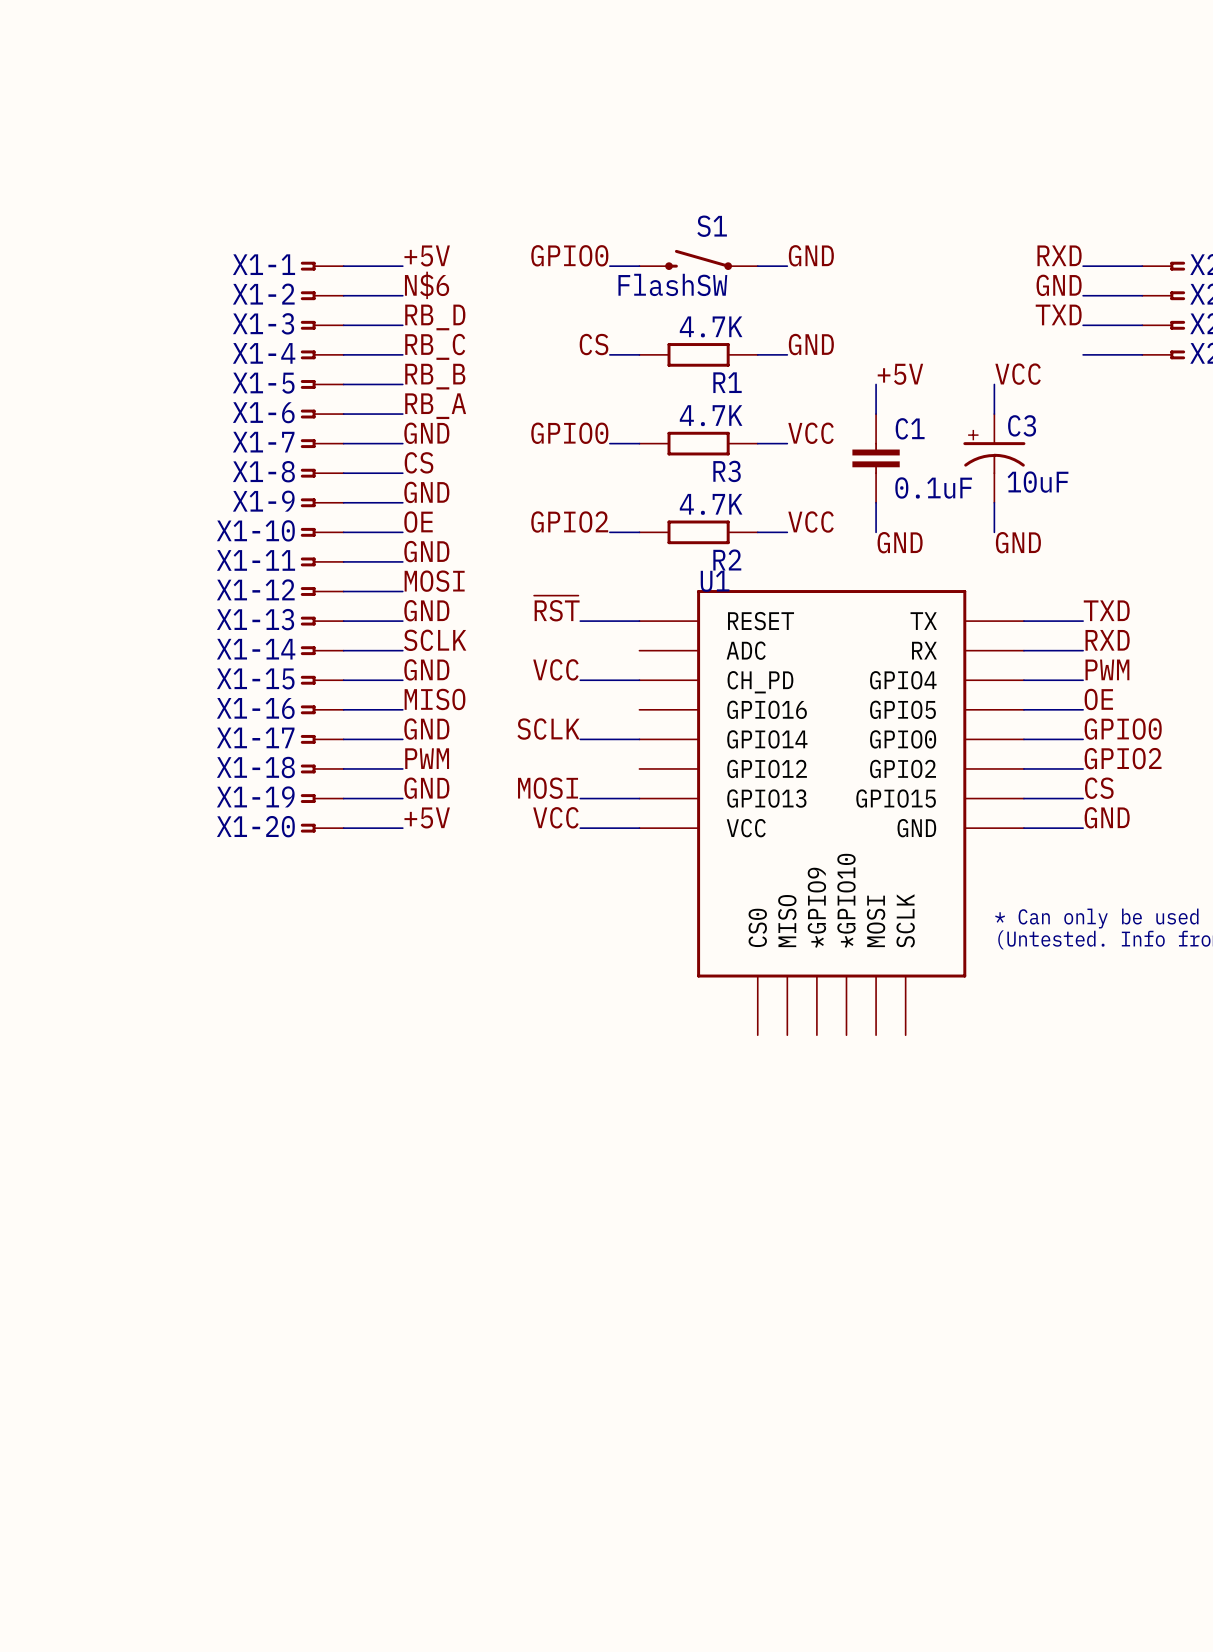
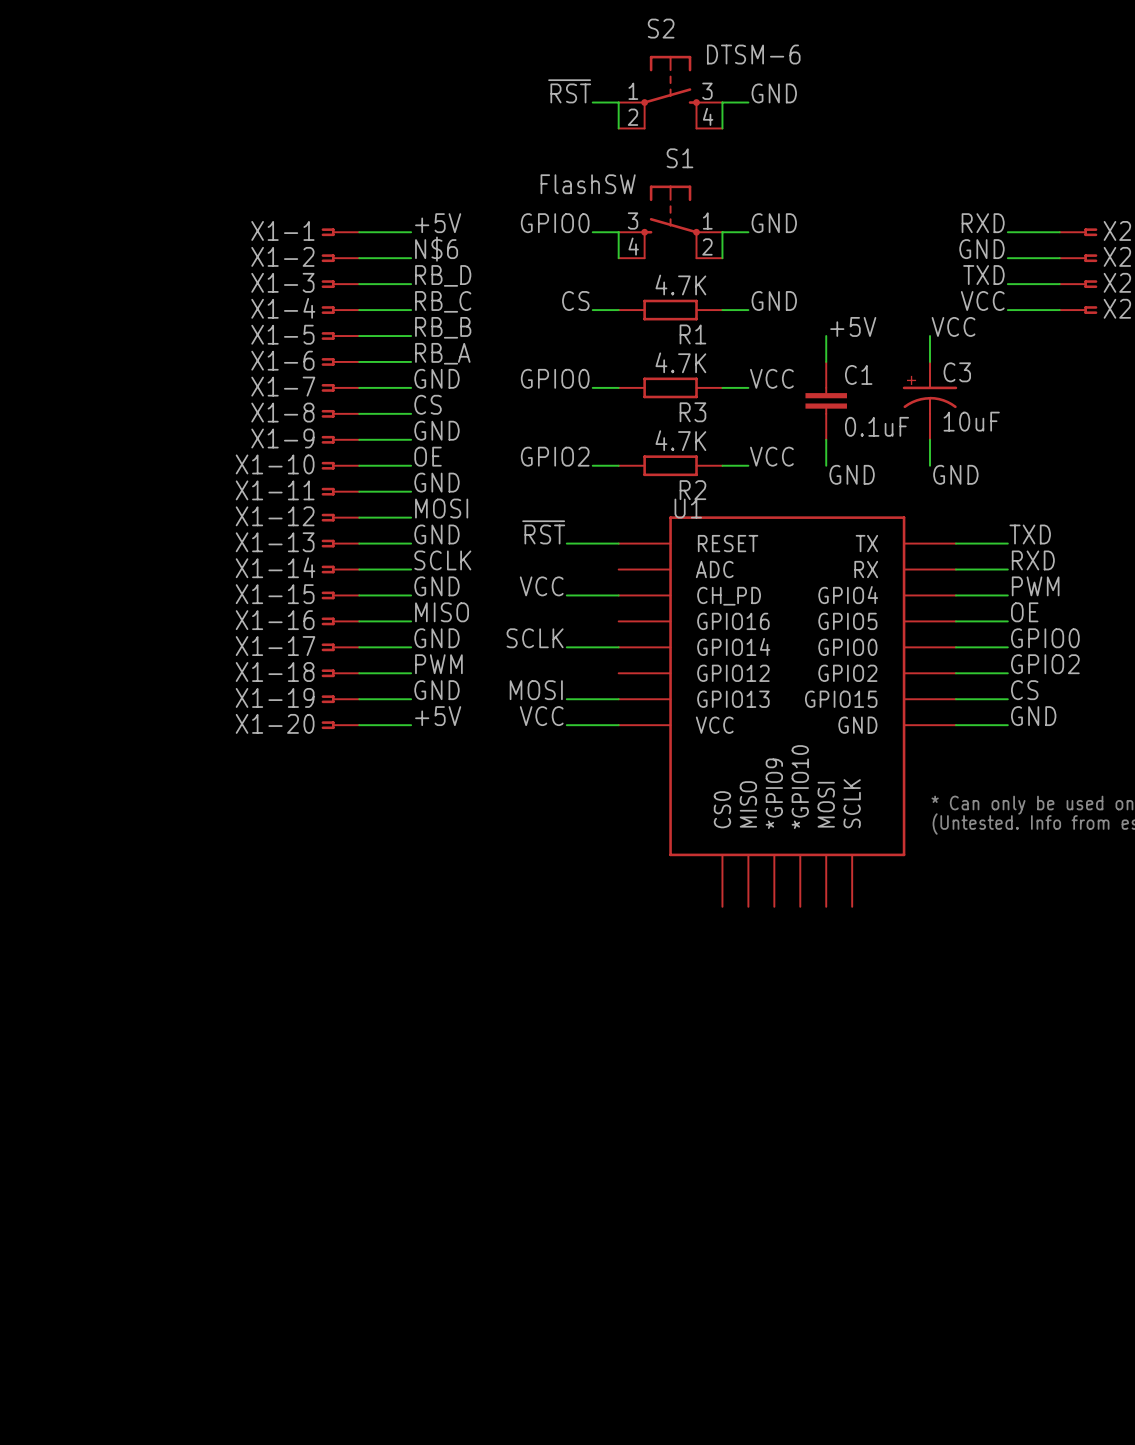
label: none -> ~{RST} (569, 91)
S2: none -> DTSM-6 (670, 92)
label: none -> GND (774, 93)
wire: none -> (592, 102) (618, 102) (618, 128)
wire: none -> (748, 102) (722, 102) (722, 128)
S1 name position: S1 (712, 226) -> S1 (679, 158)
S1 symbol: [639, 249, 758, 270] -> [618, 185, 723, 259]
wire: none -> (618, 232) (618, 258)
wire: none -> (722, 232) (722, 258)
S1 value position: FlashSW (672, 284) -> FlashSW (588, 184)
label: none -> VCC (982, 300)

